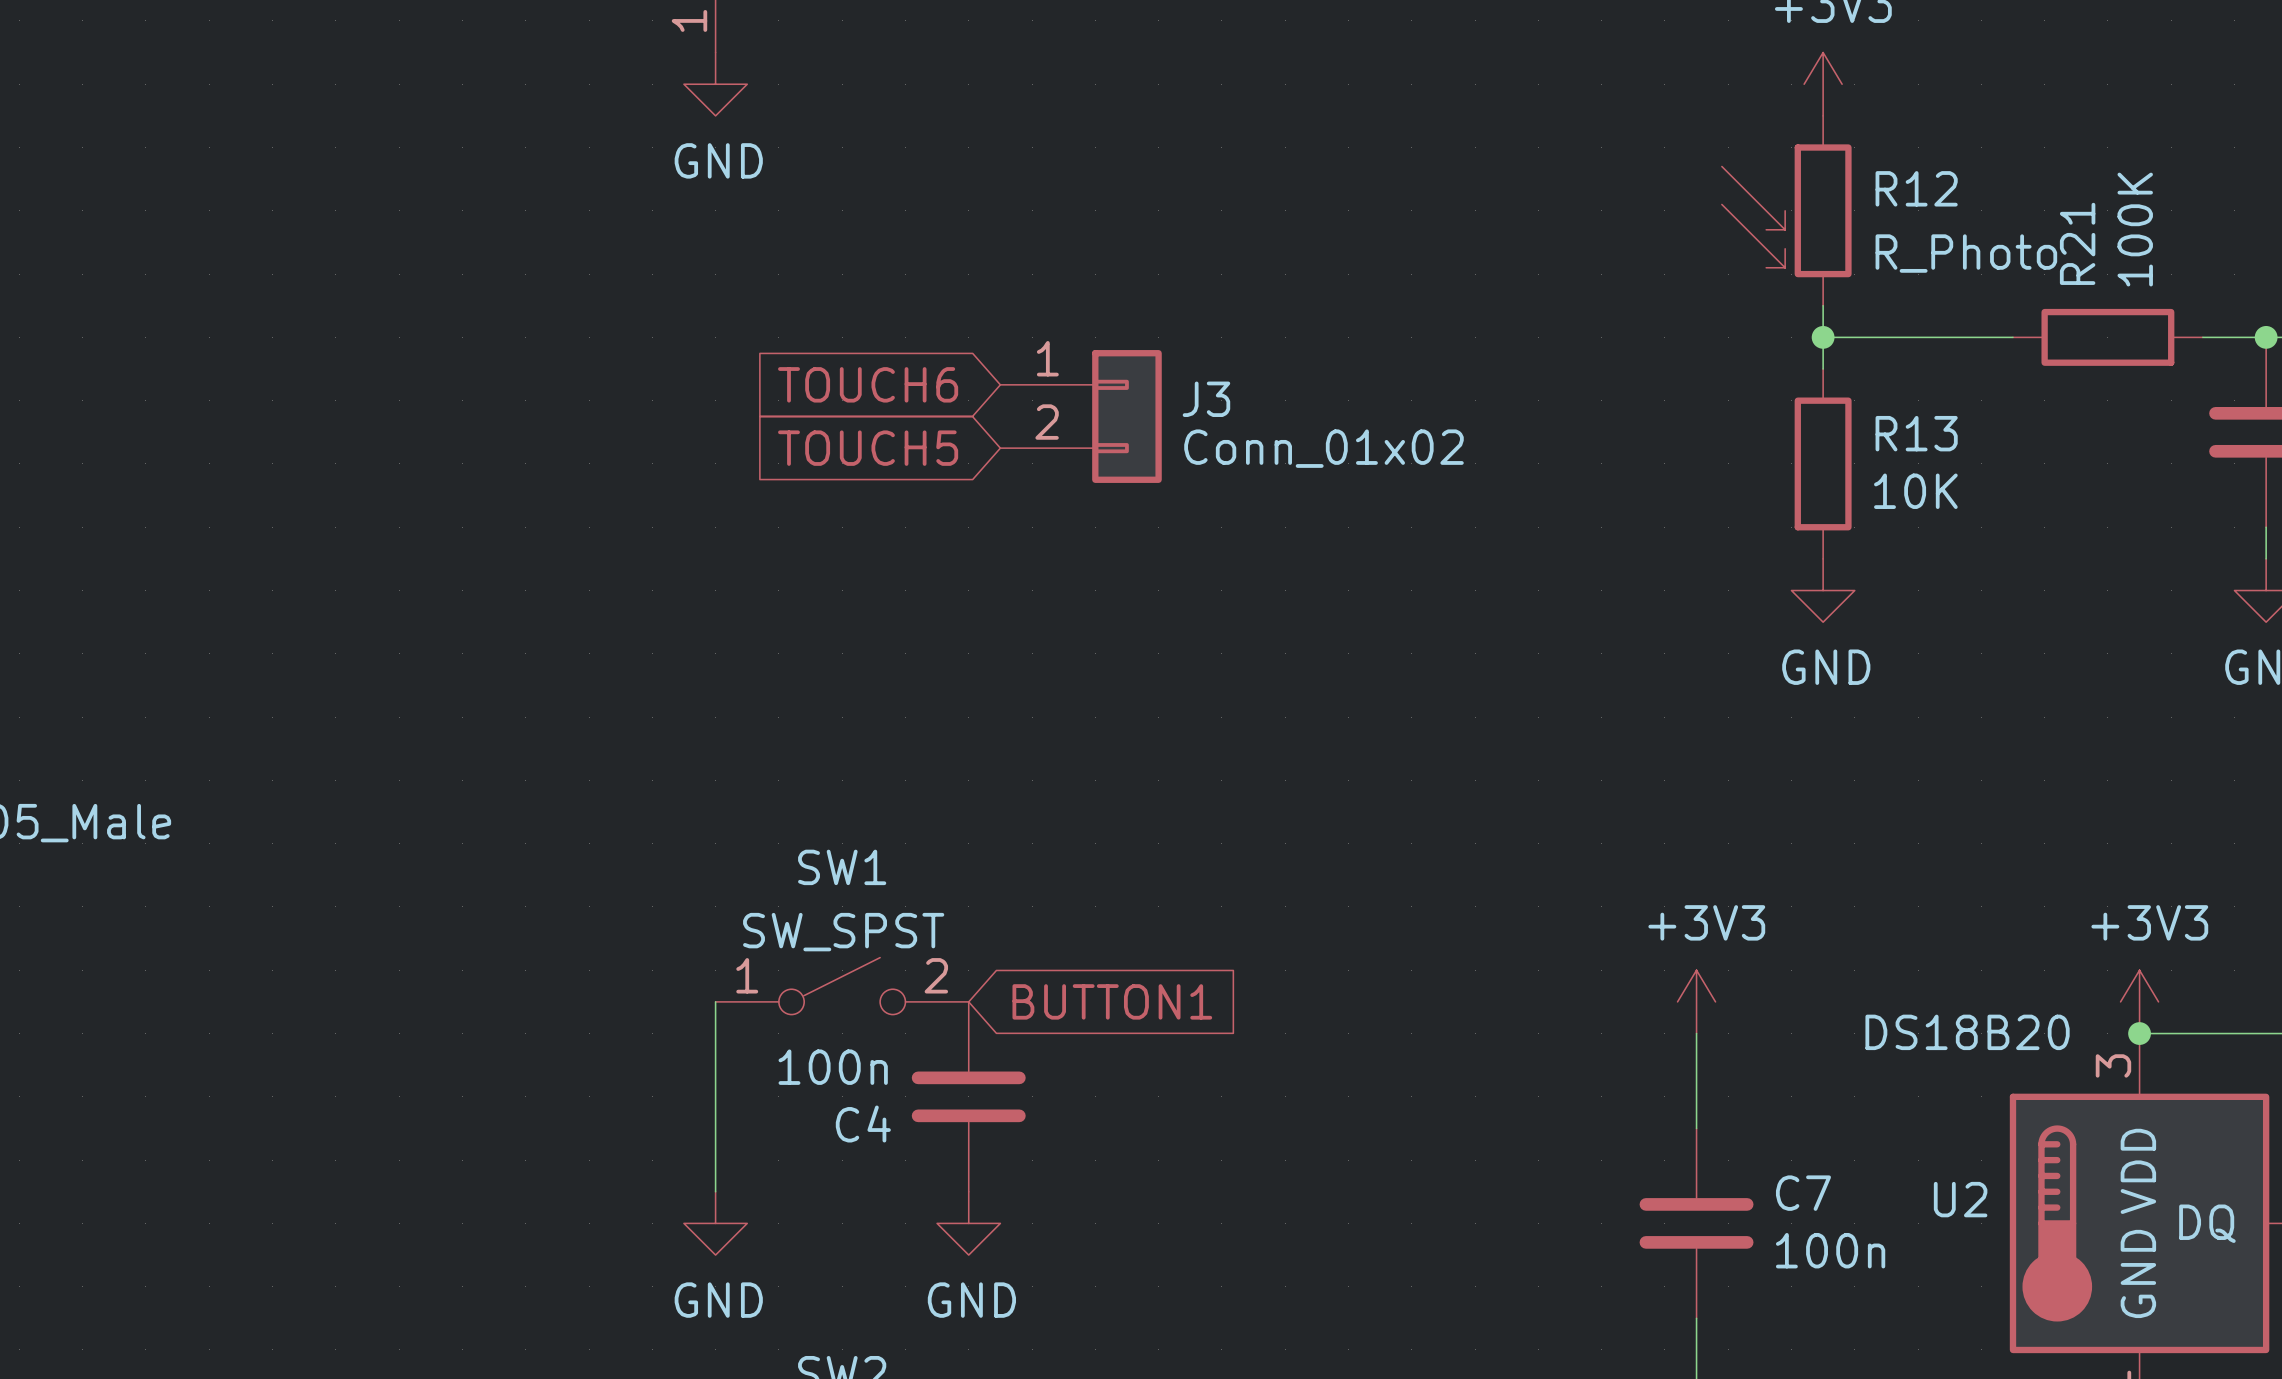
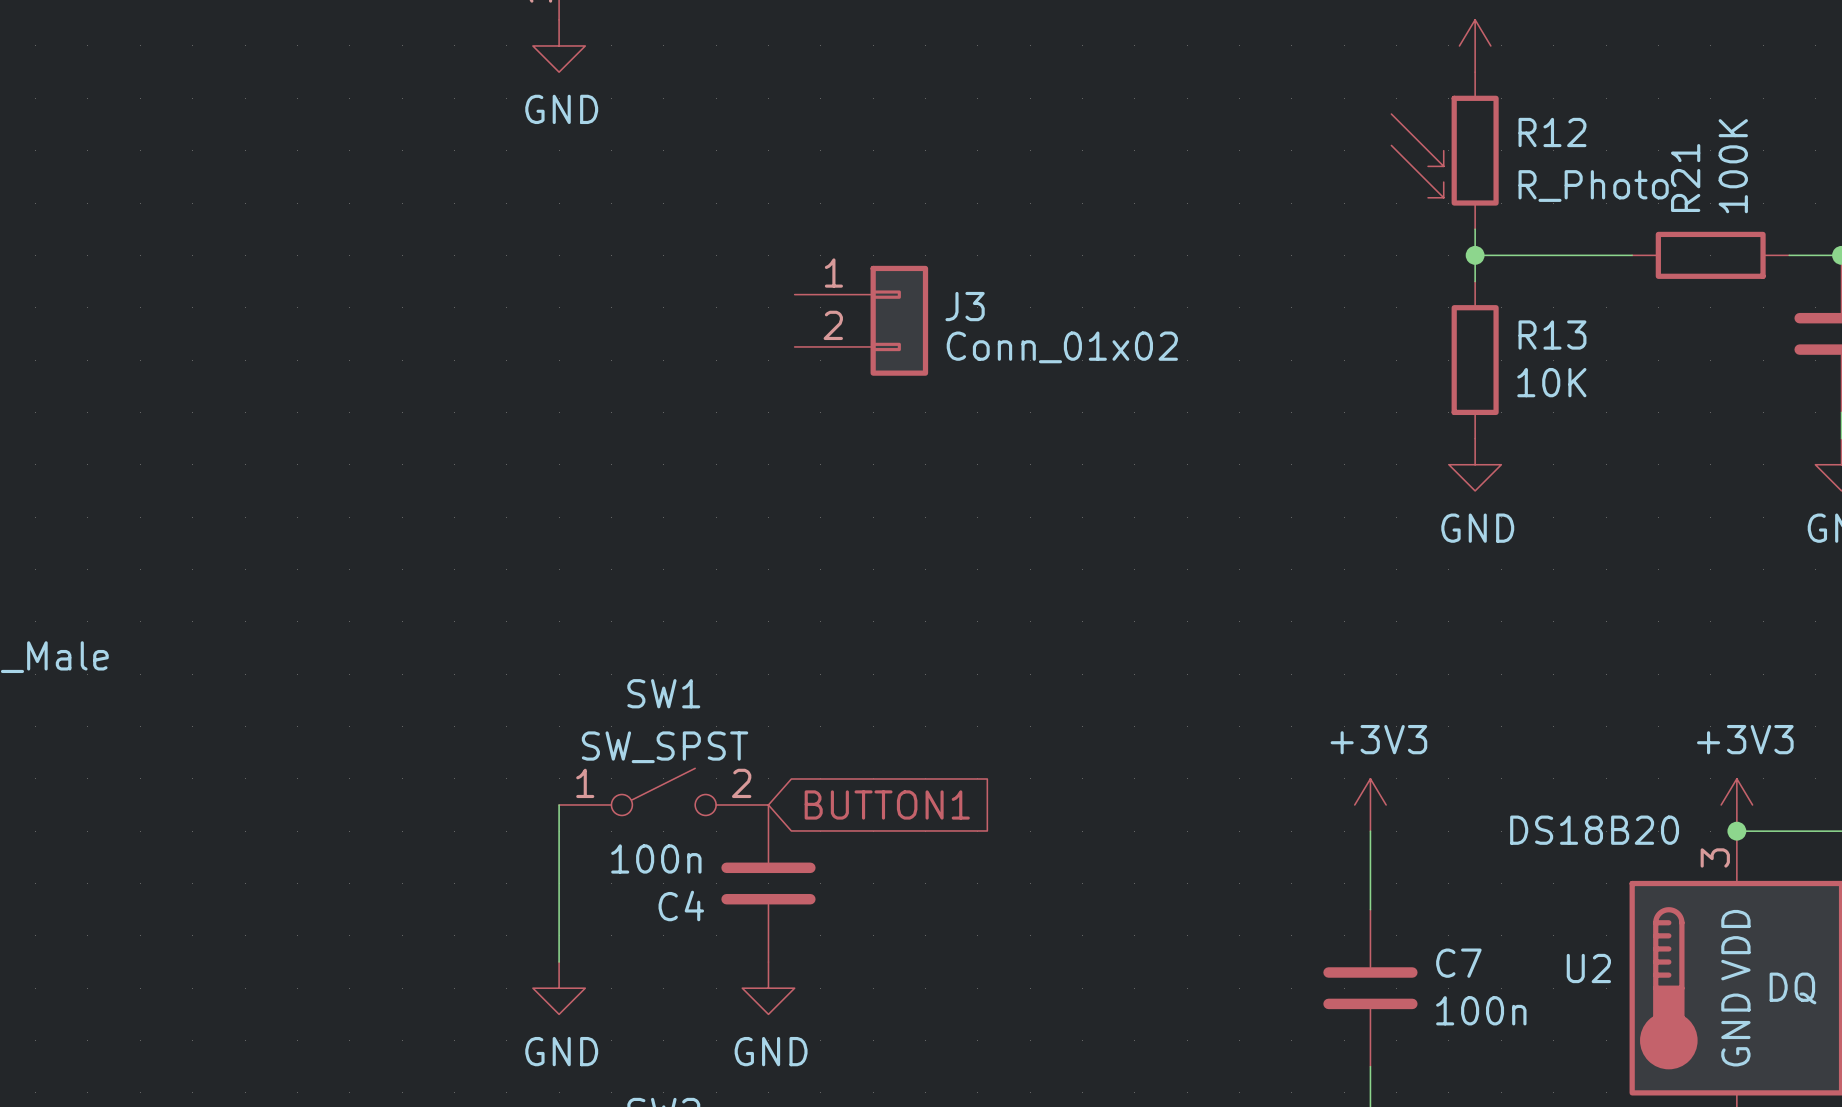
global label: TOUCH6 (868, 384) -> none
global label: TOUCH5 (868, 448) -> none

